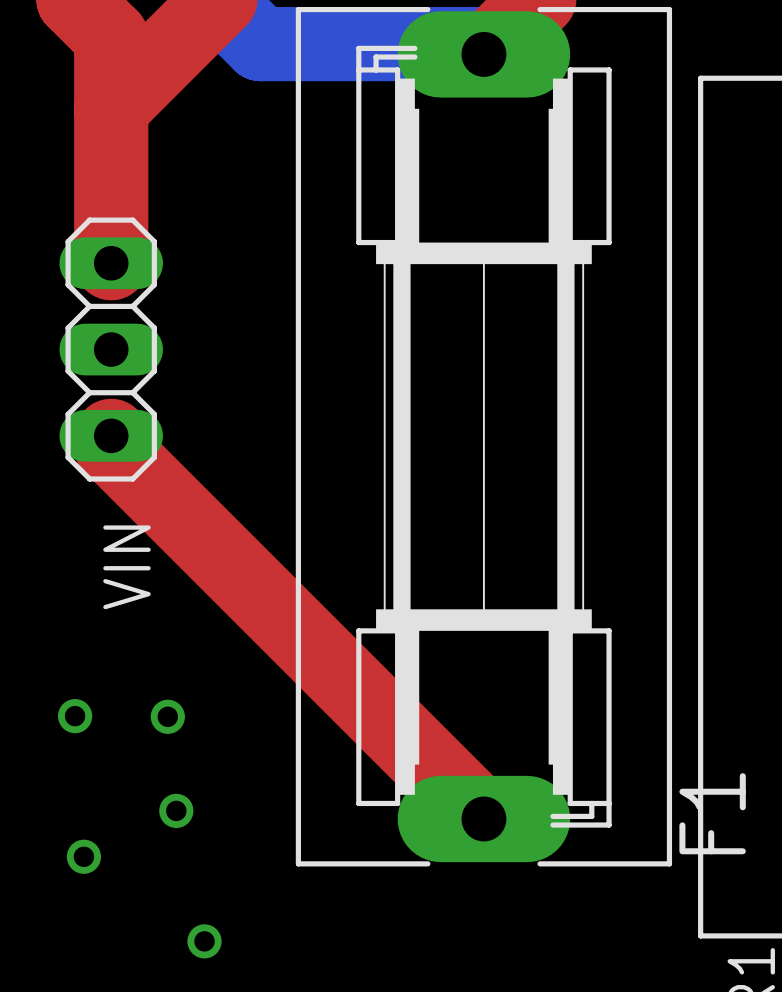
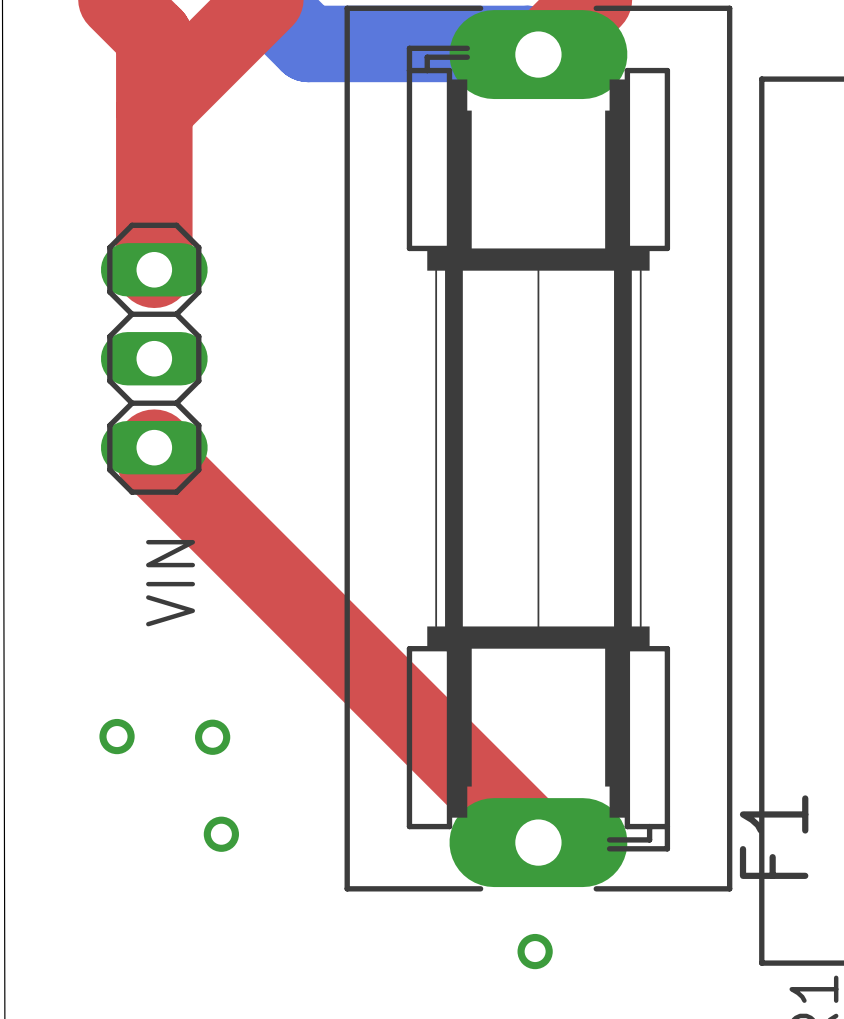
via: (83, 856) -> none
via: none -> (535, 951)
via: (204, 941) -> none

